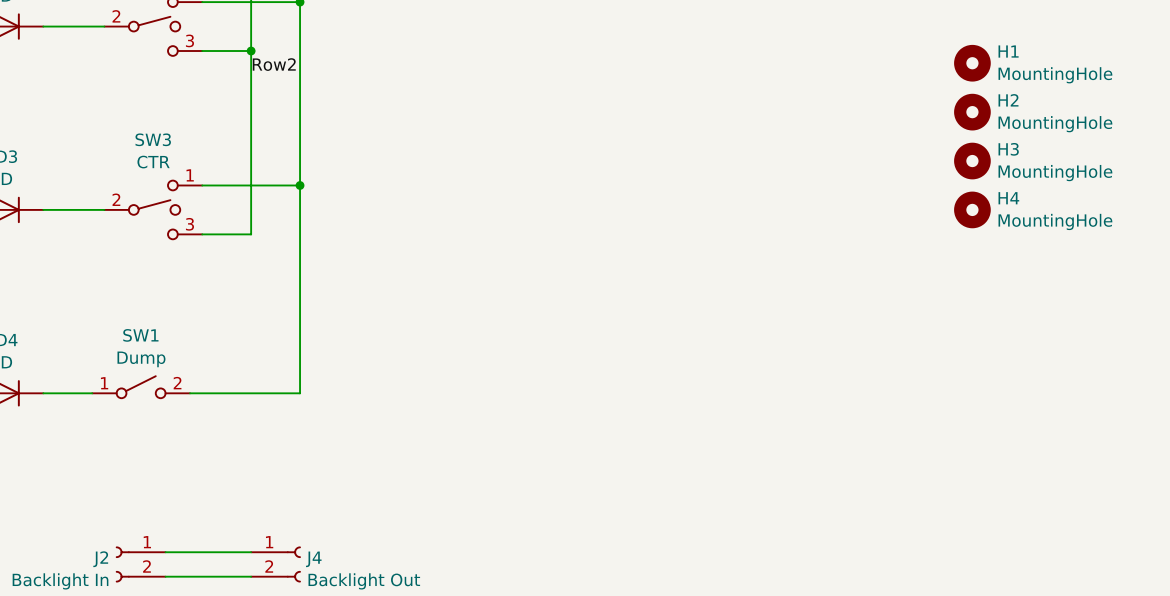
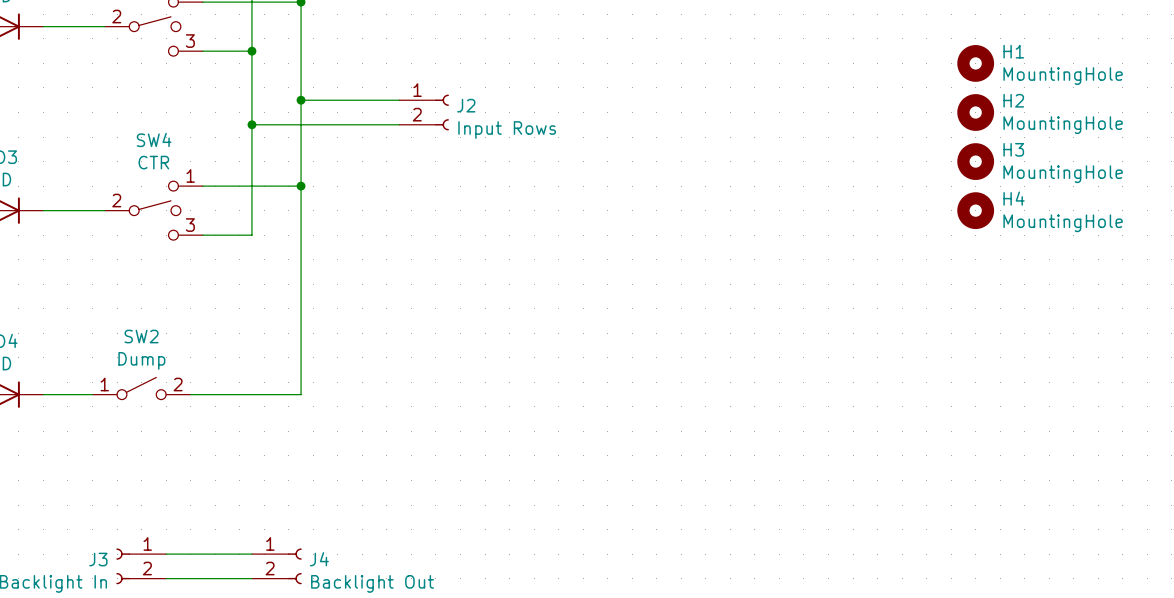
label: Row2 (274, 64) -> none
wire: none -> (301, 100) (399, 100)
junction: none -> (301, 100)
J2: none -> Input Rows (424, 112)
wire: none -> (251, 124) (399, 124)
junction: none -> (251, 124)
SW3 name: SW3 (153, 139) -> SW4 (154, 139)
SW1 name: SW1 (140, 335) -> SW2 (141, 336)
J2 name: J2 (100, 559) -> J3 (98, 559)

